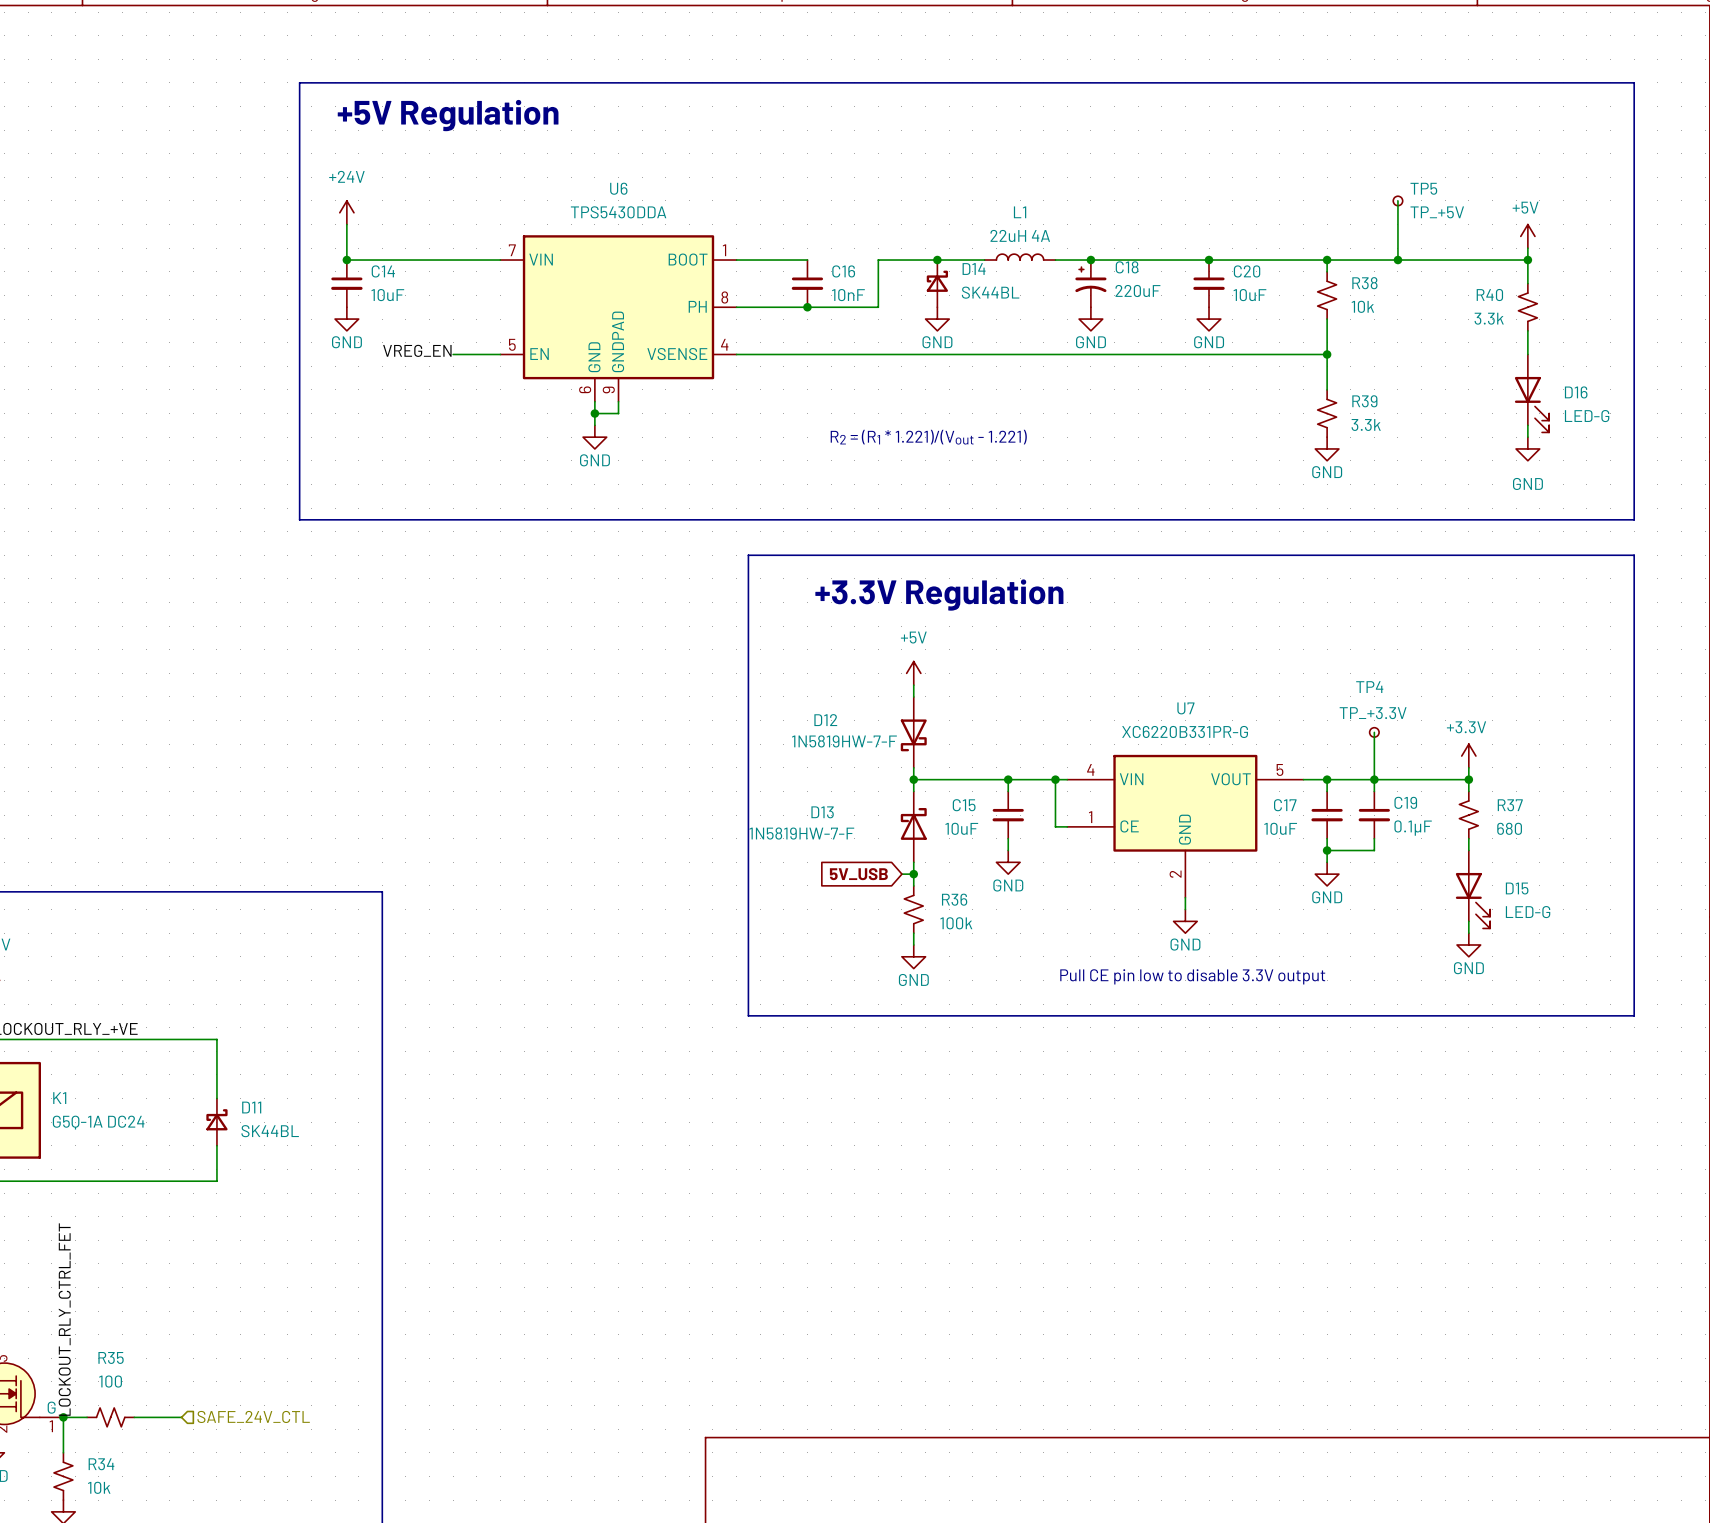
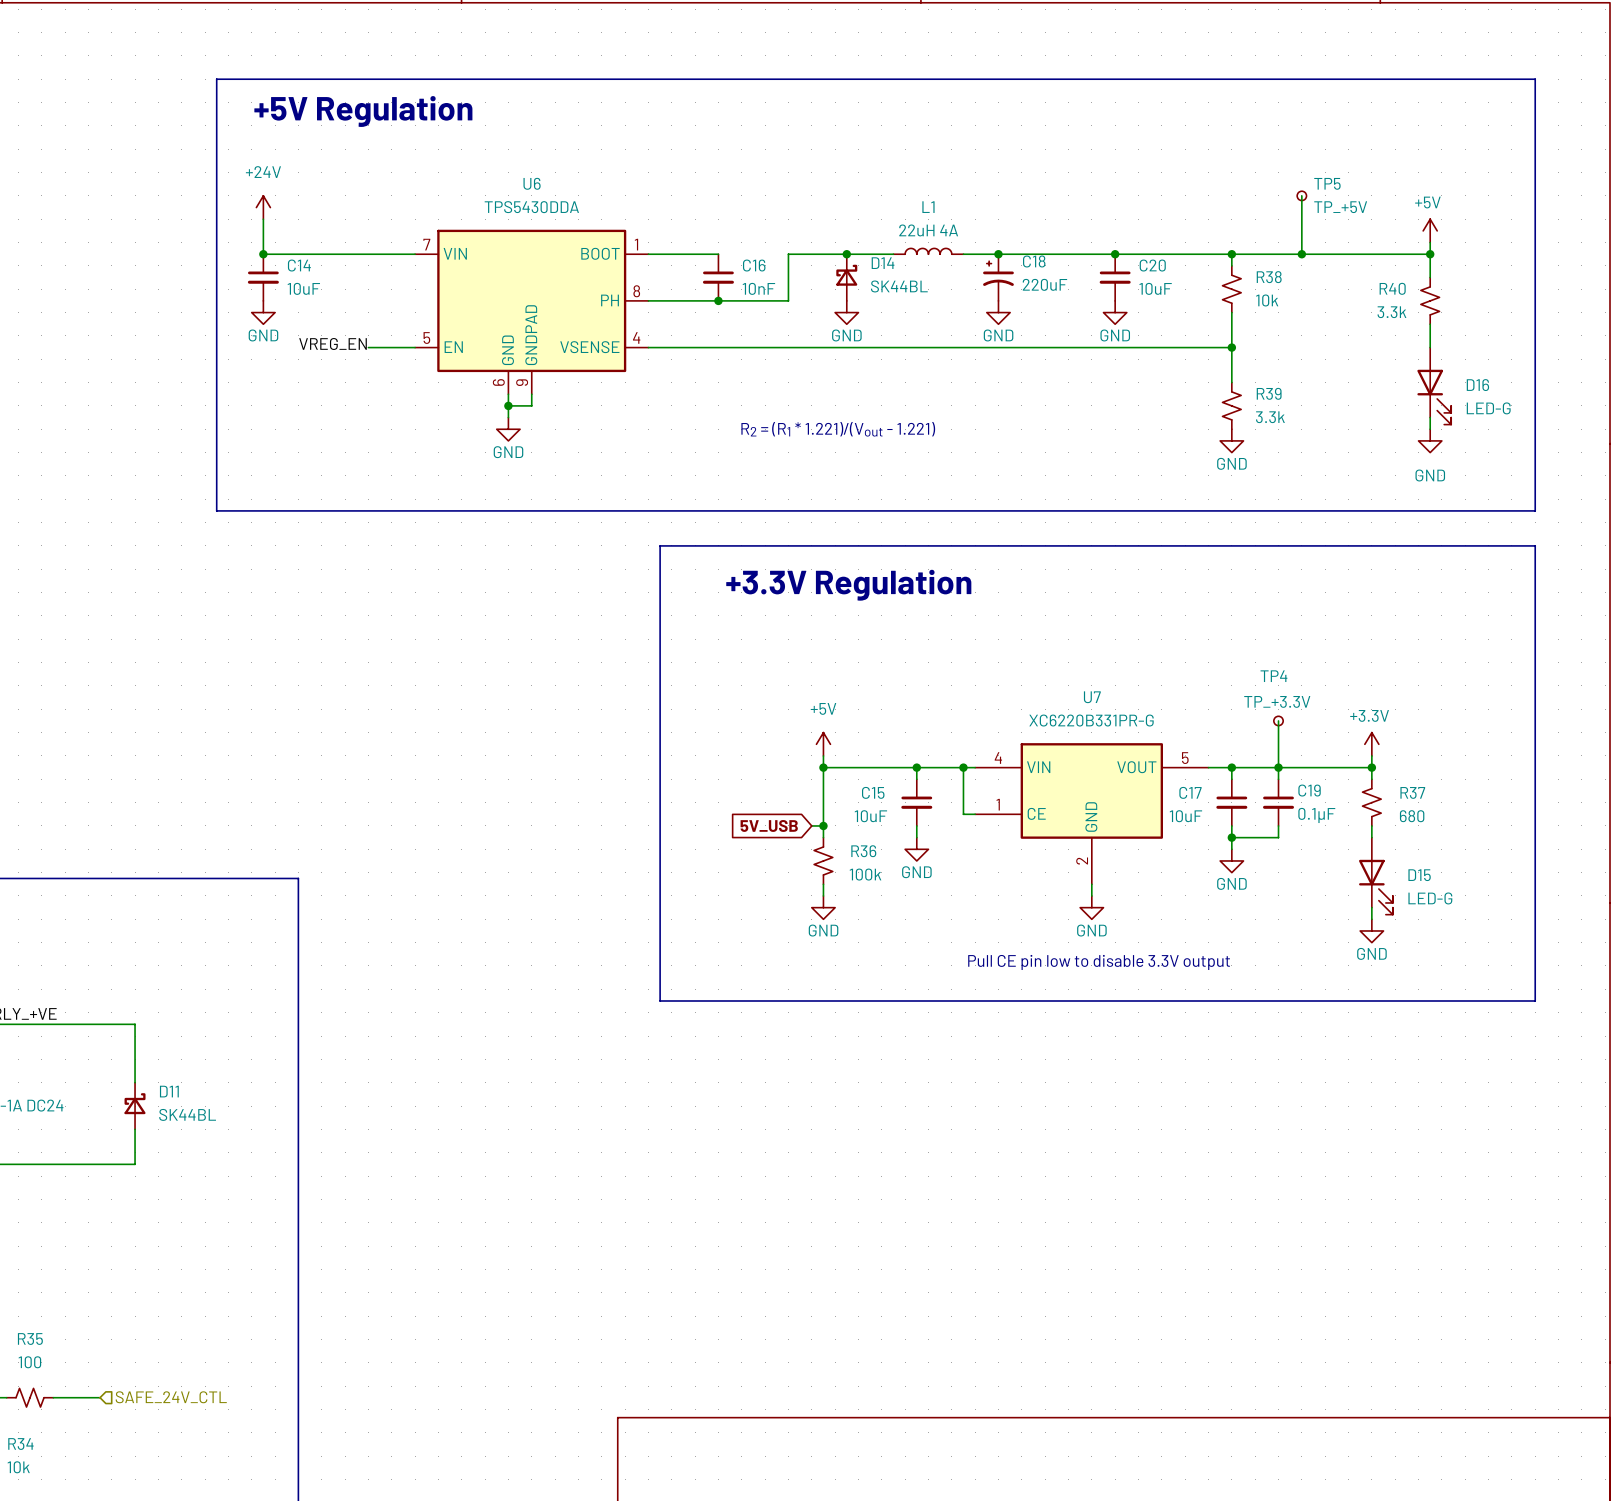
power symbol position: +5V (913, 673) -> +5V (823, 744)
wire: (913, 685) (913, 696) -> none
D12: 1N5819HW-7-F (913, 732) -> none
D13: 1N5819HW-7-F (913, 826) -> none
wire: (913, 862) (913, 885) -> none
global label position: 5V_USB (858, 874) -> 5V_USB (769, 825)
junction position: (913, 874) -> (823, 825)
R36 position: (913, 909) -> (823, 860)
wire: (913, 933) (913, 944) -> (823, 884) (823, 895)
power symbol position: GND (913, 956) -> GND (823, 907)

